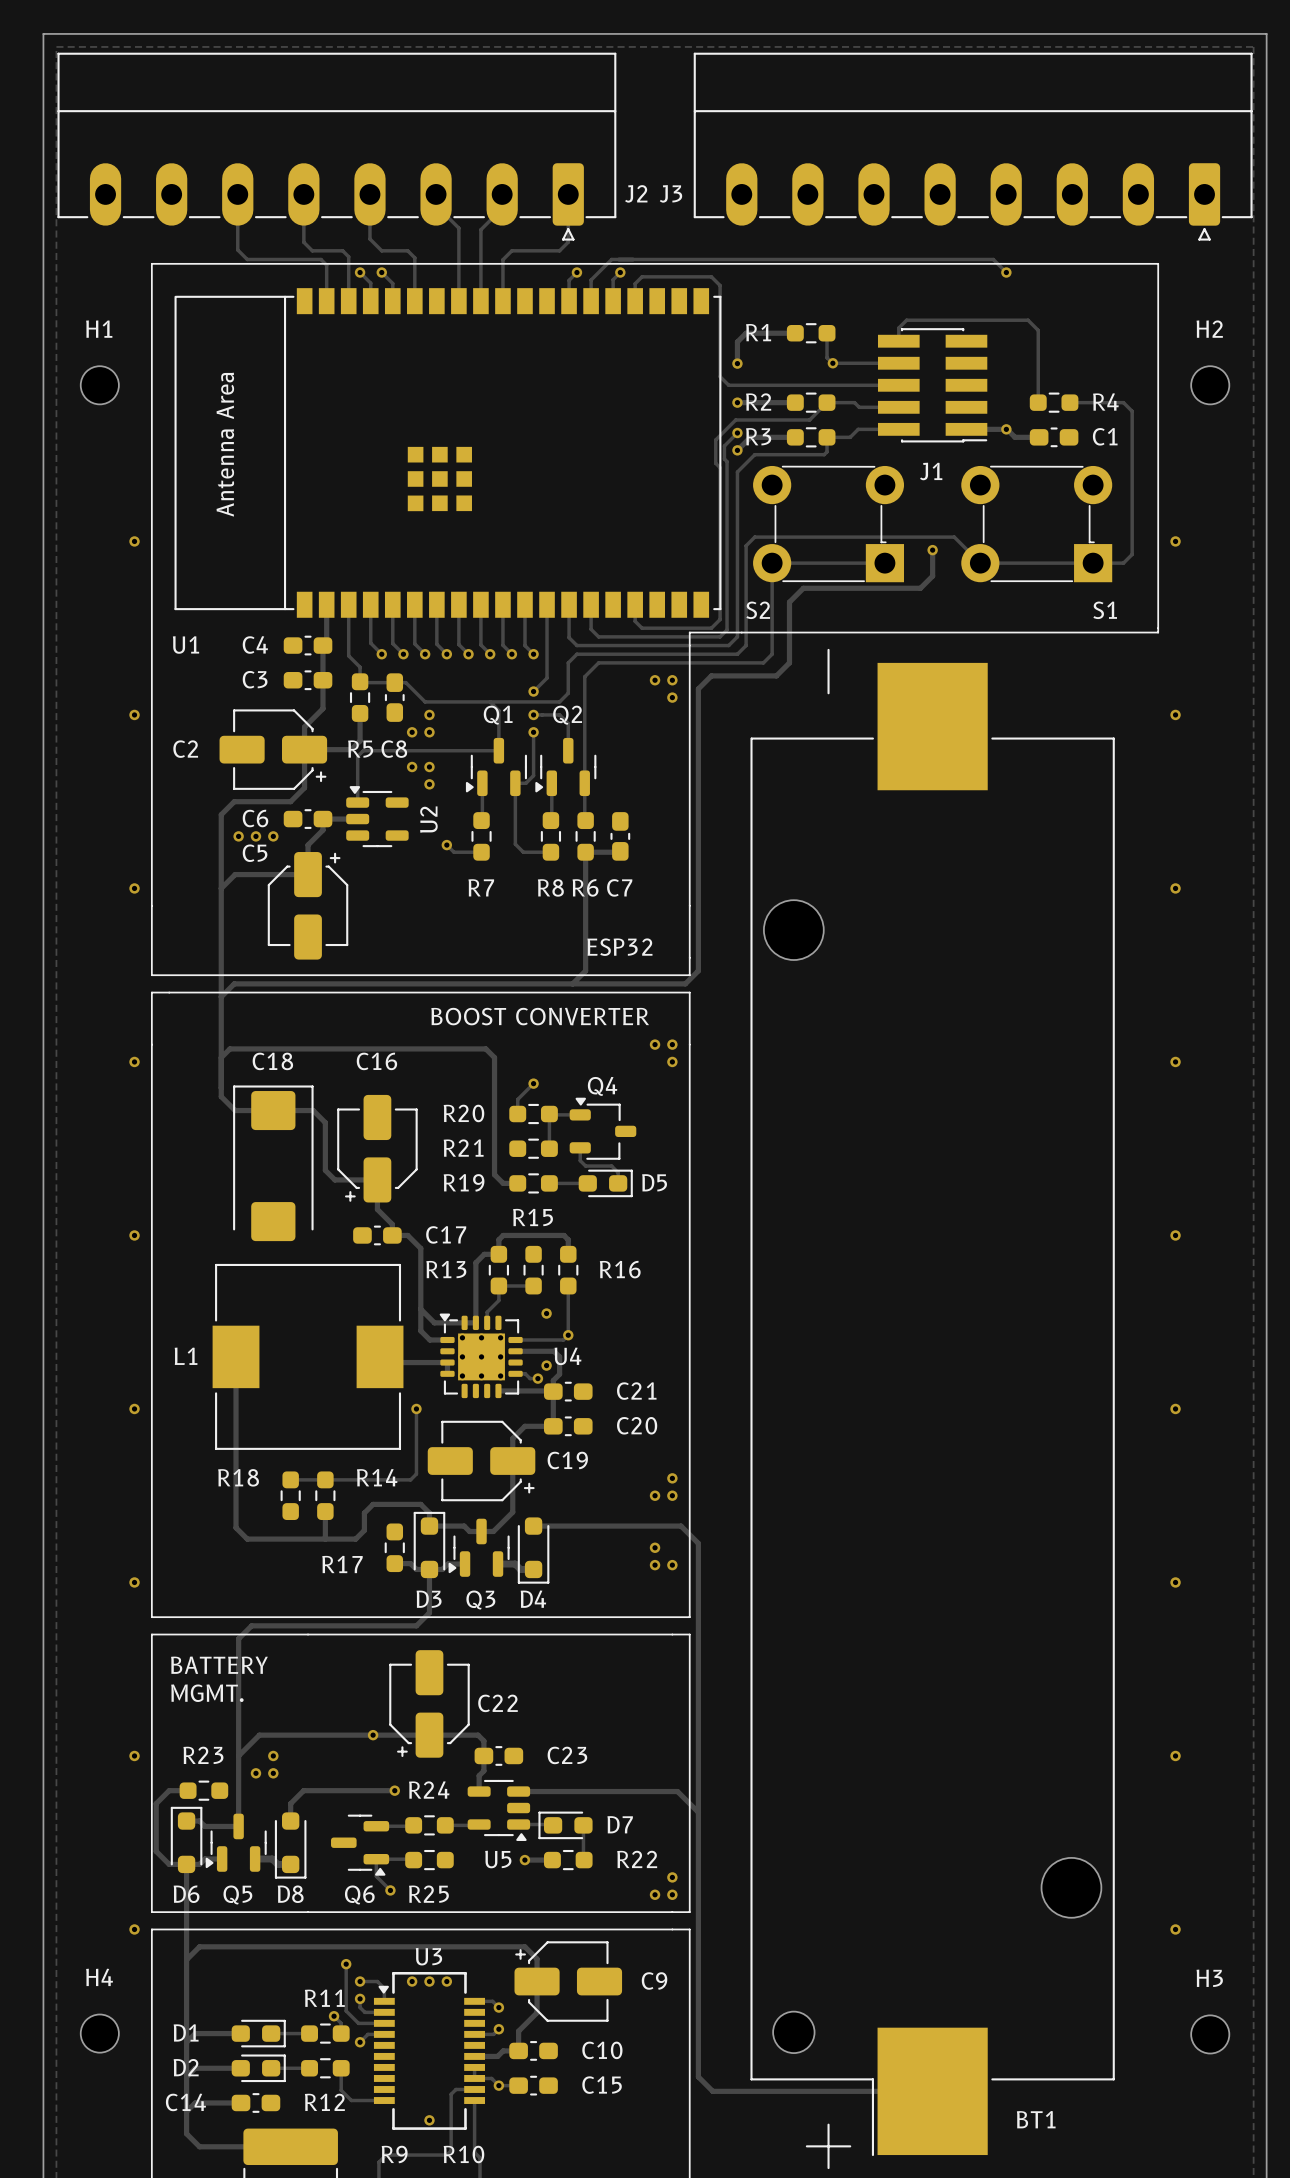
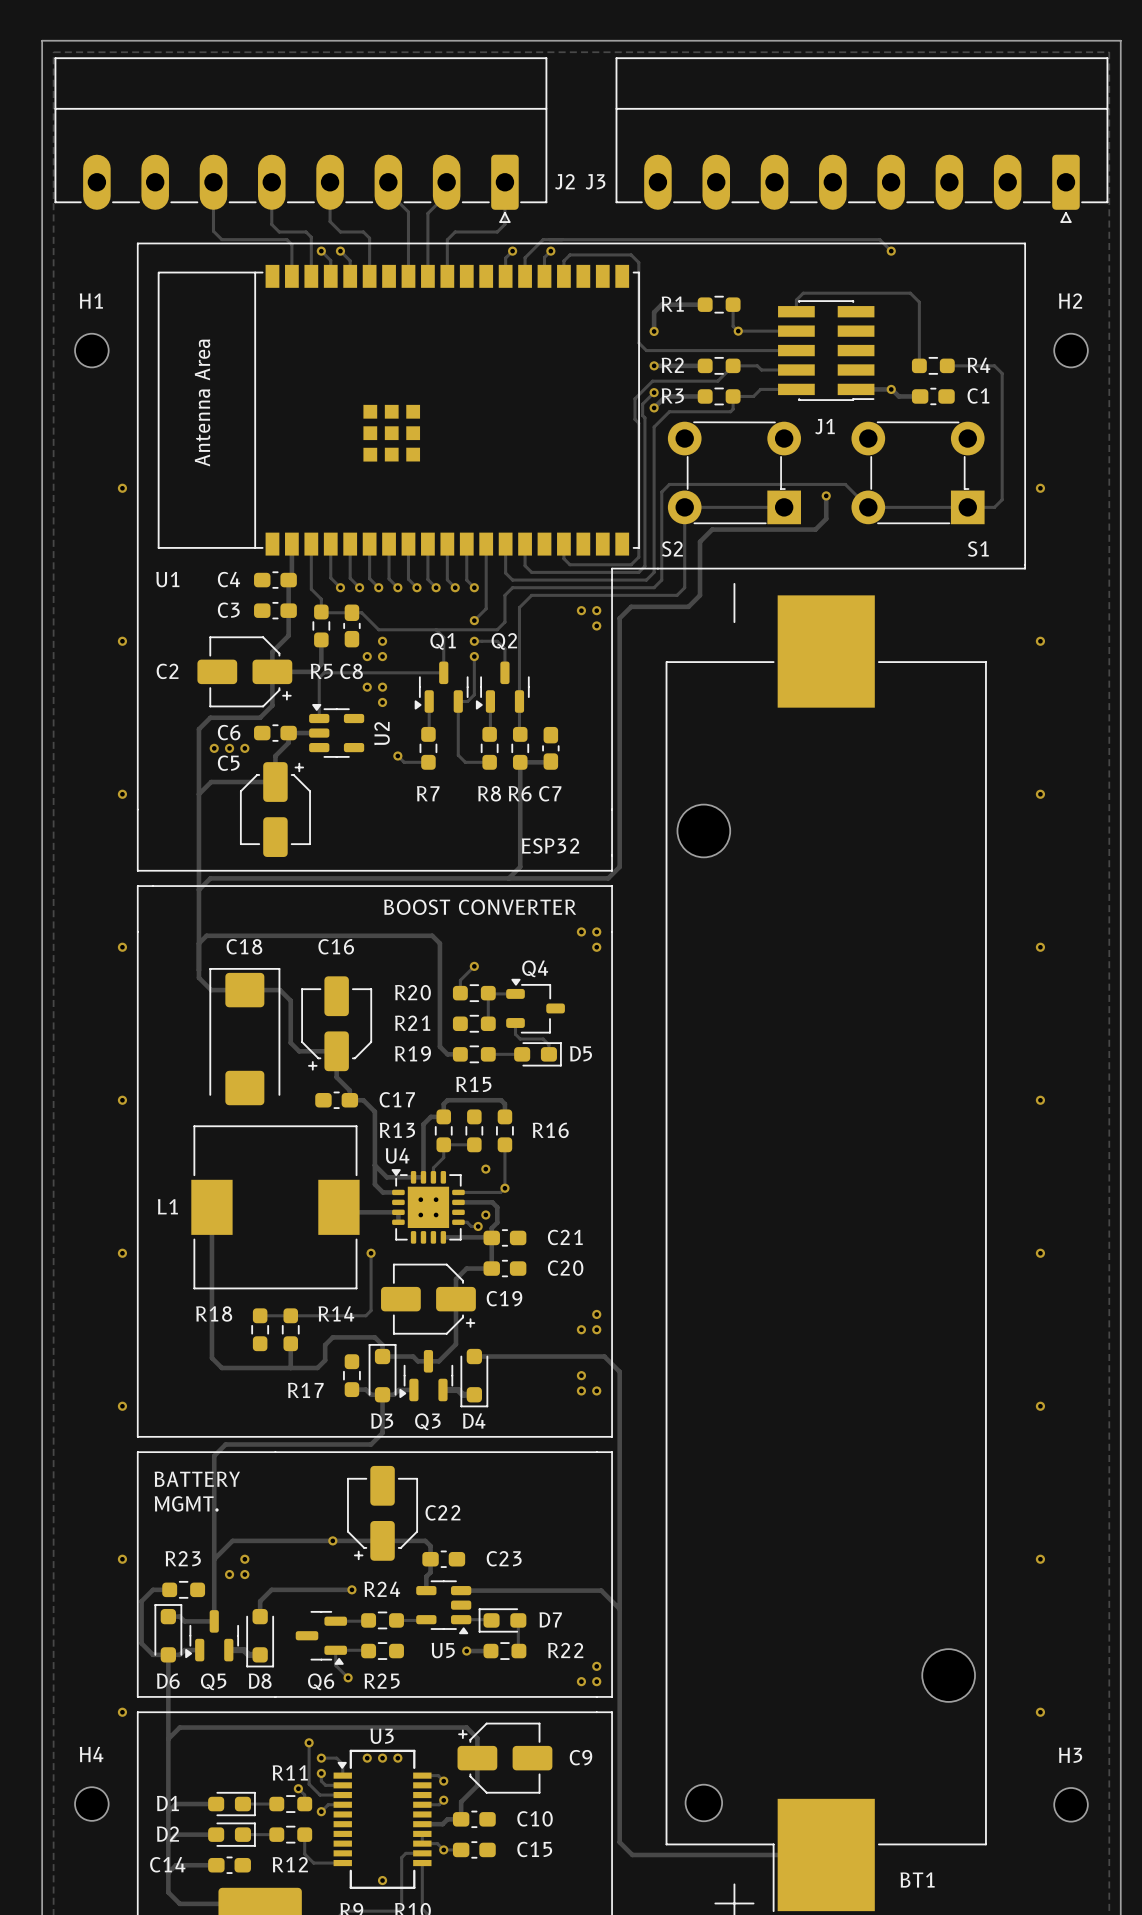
U4 footprint: [439, 1313, 523, 1399] -> [391, 1169, 465, 1244]
U4 name position: U4 (567, 1356) -> U4 (397, 1155)

